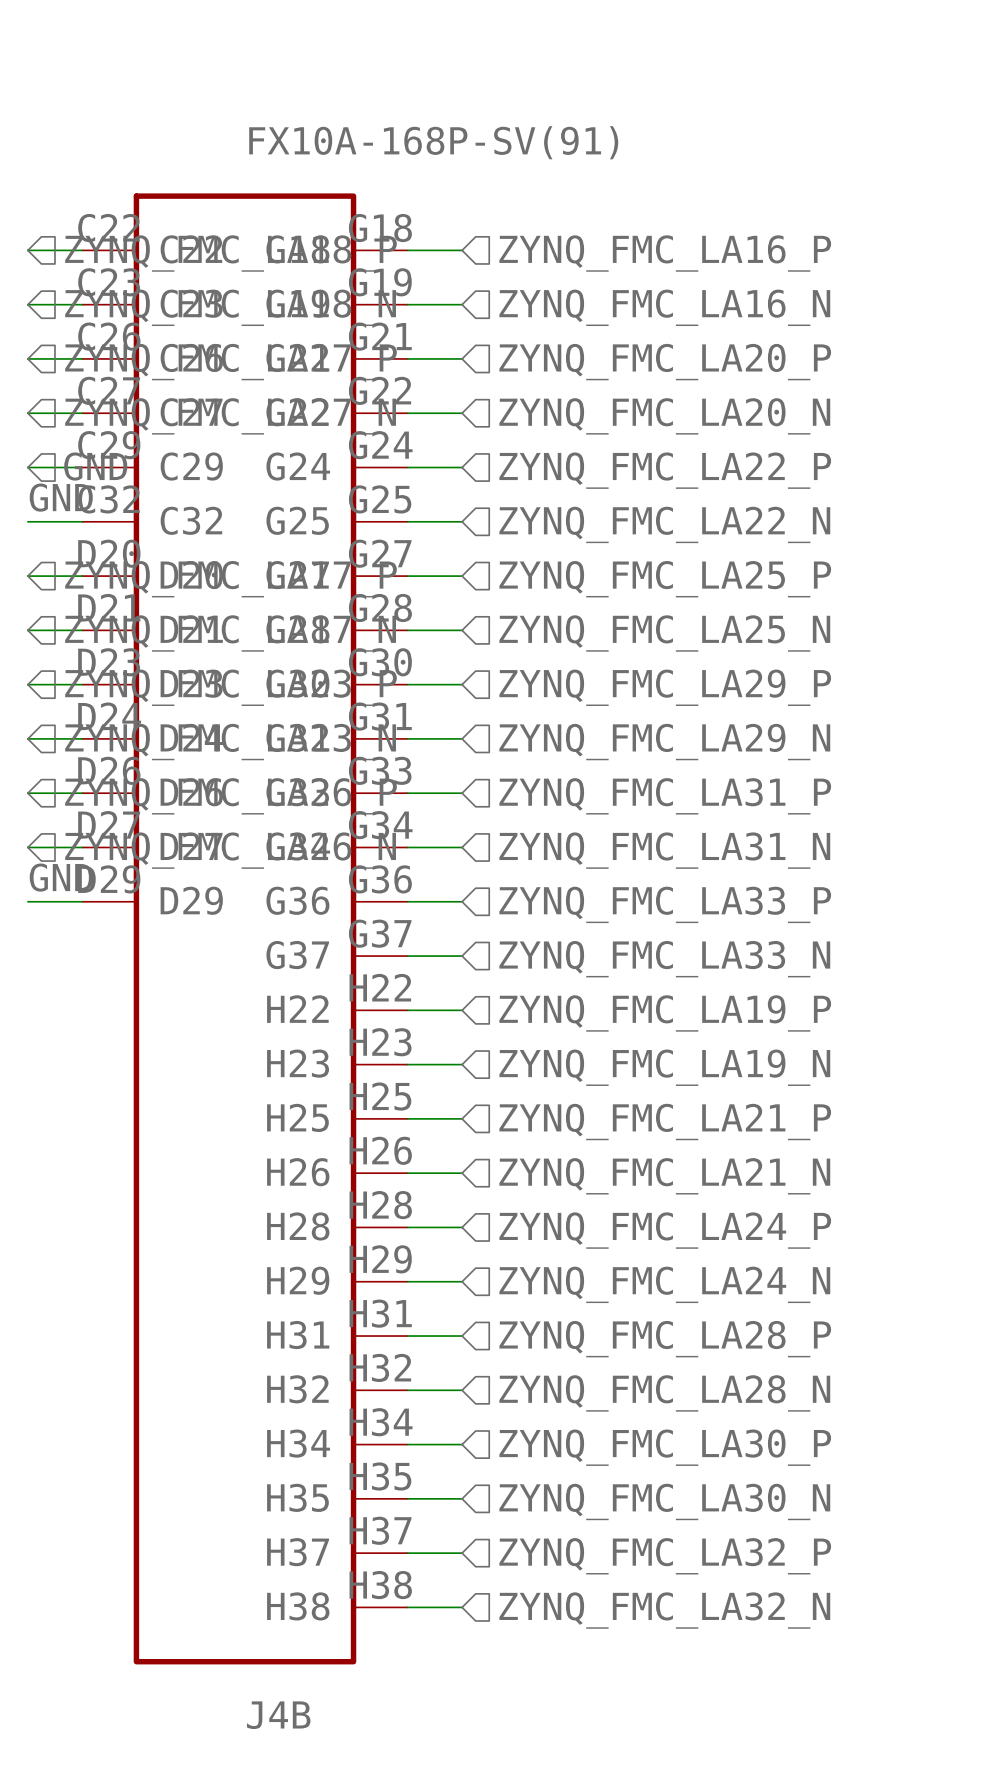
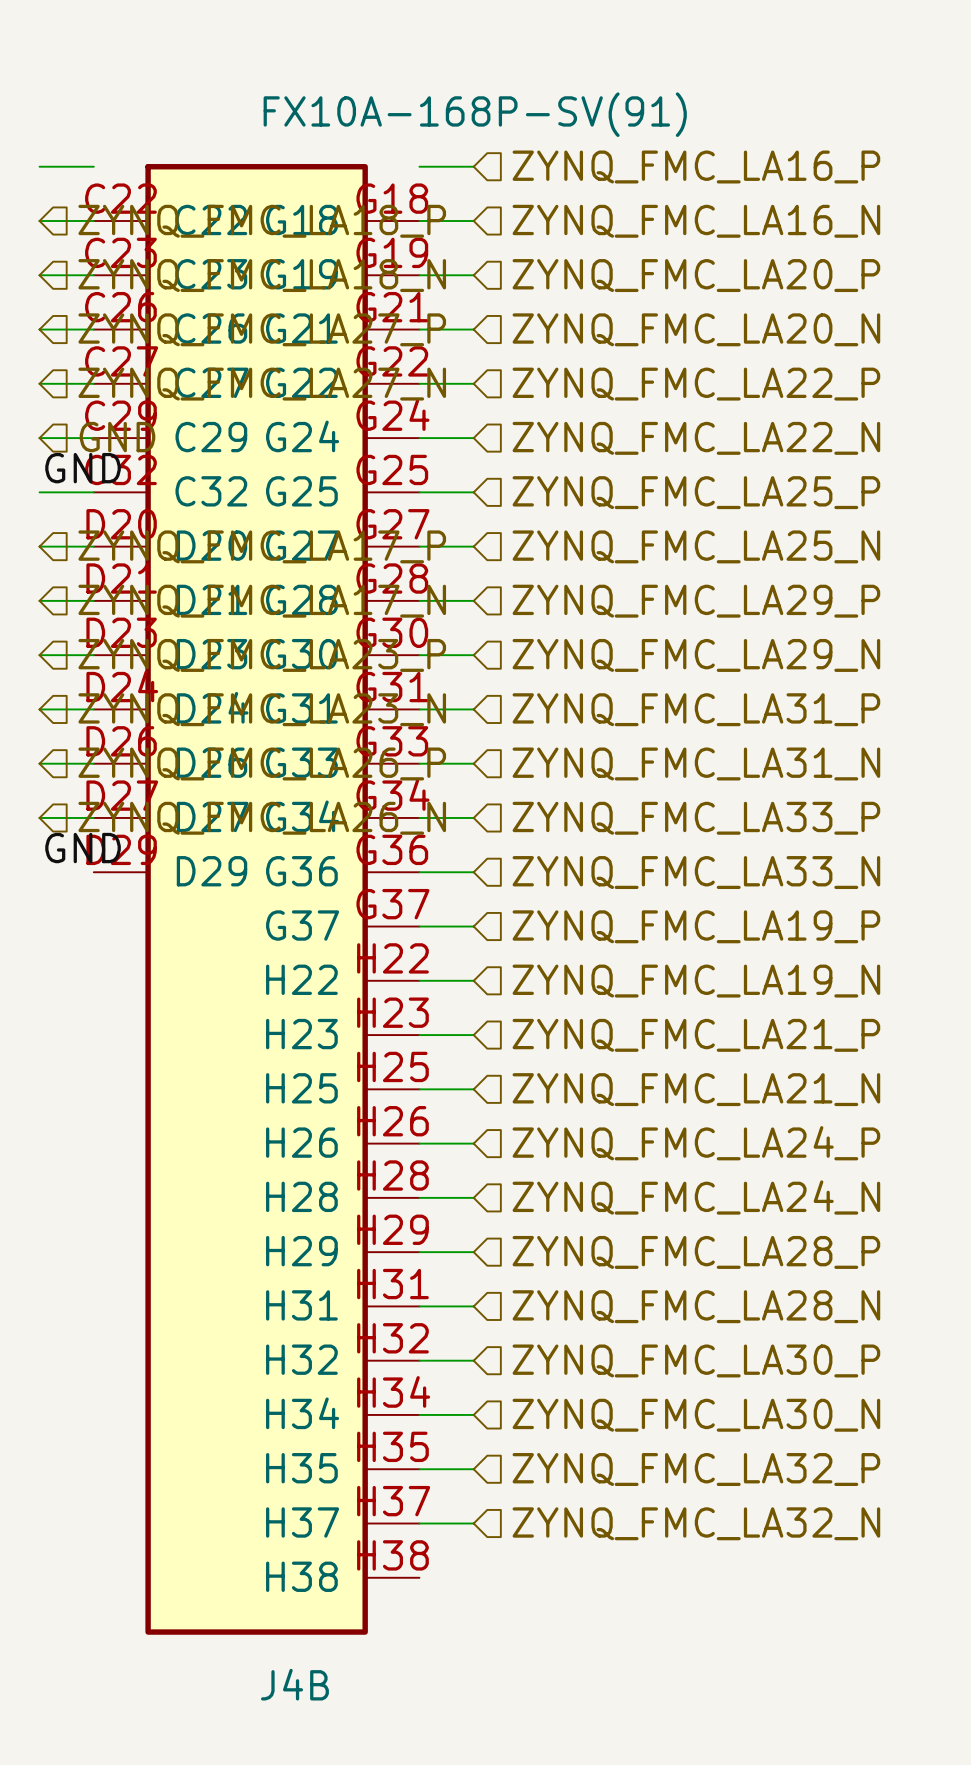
wire: none -> (39, 166) (93, 166)
wire: none -> (419, 166) (473, 166)
hierarchical label: none -> ZYNQ_FMC_LA16_P (696, 167)
hierarchical label: ZYNQ_FMC_LA16_P (665, 253) -> ZYNQ_FMC_LA16_N (696, 221)
hierarchical label: ZYNQ_FMC_LA16_N (664, 307) -> ZYNQ_FMC_LA20_P (696, 275)
hierarchical label: ZYNQ_FMC_LA20_P (665, 362) -> ZYNQ_FMC_LA20_N (696, 329)
hierarchical label: ZYNQ_FMC_LA20_N (664, 416) -> ZYNQ_FMC_LA22_P (696, 384)
hierarchical label: ZYNQ_FMC_LA22_P (665, 470) -> ZYNQ_FMC_LA22_N (696, 438)
hierarchical label: ZYNQ_FMC_LA22_N (664, 524) -> ZYNQ_FMC_LA25_P (696, 492)
hierarchical label: ZYNQ_FMC_LA25_P (665, 579) -> ZYNQ_FMC_LA25_N (696, 546)
hierarchical label: ZYNQ_FMC_LA25_N (664, 633) -> ZYNQ_FMC_LA29_P (696, 601)
hierarchical label: ZYNQ_FMC_LA29_P (665, 687) -> ZYNQ_FMC_LA29_N (696, 655)
hierarchical label: ZYNQ_FMC_LA29_N (664, 742) -> ZYNQ_FMC_LA31_P (696, 709)
hierarchical label: ZYNQ_FMC_LA31_P (665, 796) -> ZYNQ_FMC_LA31_N (696, 763)
hierarchical label: ZYNQ_FMC_LA31_N (664, 850) -> ZYNQ_FMC_LA33_P (696, 818)
wire: (27, 901) (82, 901) -> none
hierarchical label: ZYNQ_FMC_LA33_P (665, 904) -> ZYNQ_FMC_LA33_N (696, 872)
hierarchical label: ZYNQ_FMC_LA33_N (664, 959) -> ZYNQ_FMC_LA19_P (696, 926)
hierarchical label: ZYNQ_FMC_LA19_P (665, 1013) -> ZYNQ_FMC_LA19_N (696, 981)
hierarchical label: ZYNQ_FMC_LA19_N (664, 1067) -> ZYNQ_FMC_LA21_P (696, 1035)
hierarchical label: ZYNQ_FMC_LA21_P (665, 1122) -> ZYNQ_FMC_LA21_N (696, 1089)
hierarchical label: ZYNQ_FMC_LA21_N (664, 1176) -> ZYNQ_FMC_LA24_P (696, 1143)
hierarchical label: ZYNQ_FMC_LA24_P (665, 1230) -> ZYNQ_FMC_LA24_N (696, 1197)
hierarchical label: ZYNQ_FMC_LA24_N (664, 1284) -> ZYNQ_FMC_LA28_P (696, 1252)
hierarchical label: ZYNQ_FMC_LA28_P (665, 1339) -> ZYNQ_FMC_LA28_N (696, 1306)
hierarchical label: ZYNQ_FMC_LA28_N (664, 1393) -> ZYNQ_FMC_LA30_P (696, 1360)
hierarchical label: ZYNQ_FMC_LA30_P (665, 1447) -> ZYNQ_FMC_LA30_N (696, 1415)
hierarchical label: ZYNQ_FMC_LA30_N (664, 1501) -> ZYNQ_FMC_LA32_P (696, 1469)
hierarchical label: ZYNQ_FMC_LA32_P (665, 1556) -> ZYNQ_FMC_LA32_N (696, 1523)
wire: (407, 1607) (462, 1607) -> none
hierarchical label: ZYNQ_FMC_LA32_N (664, 1610) -> none

